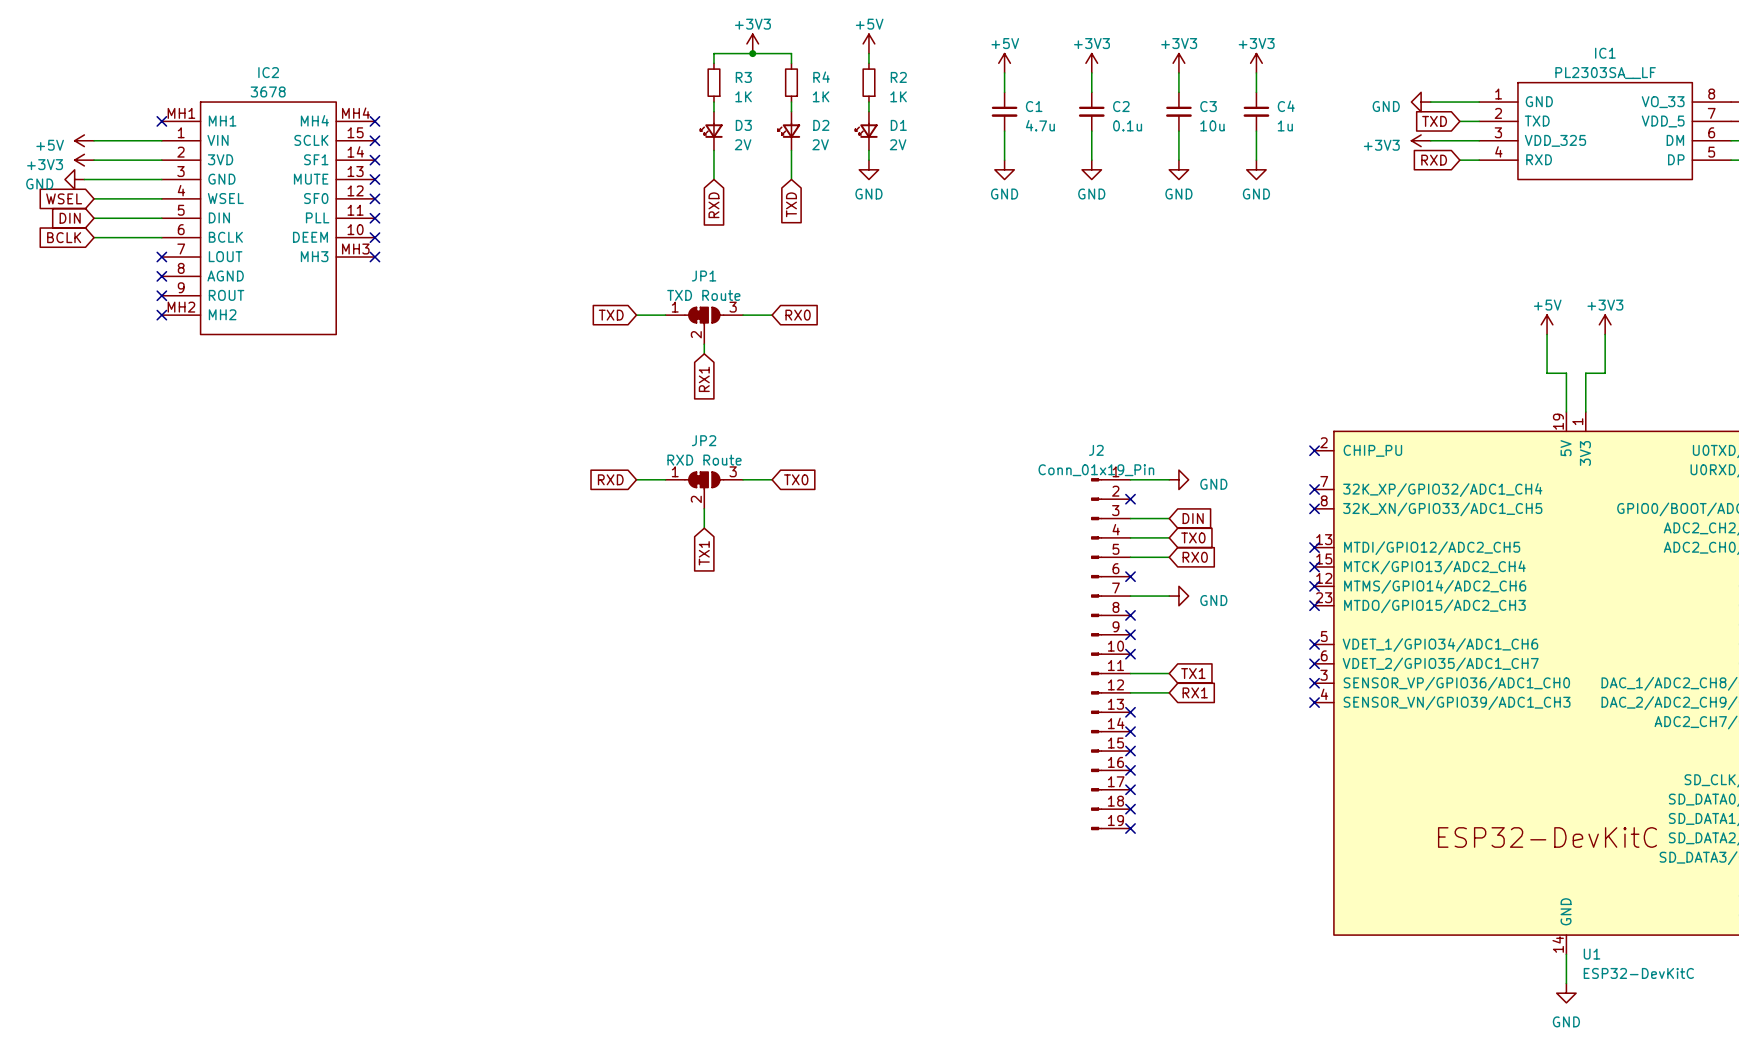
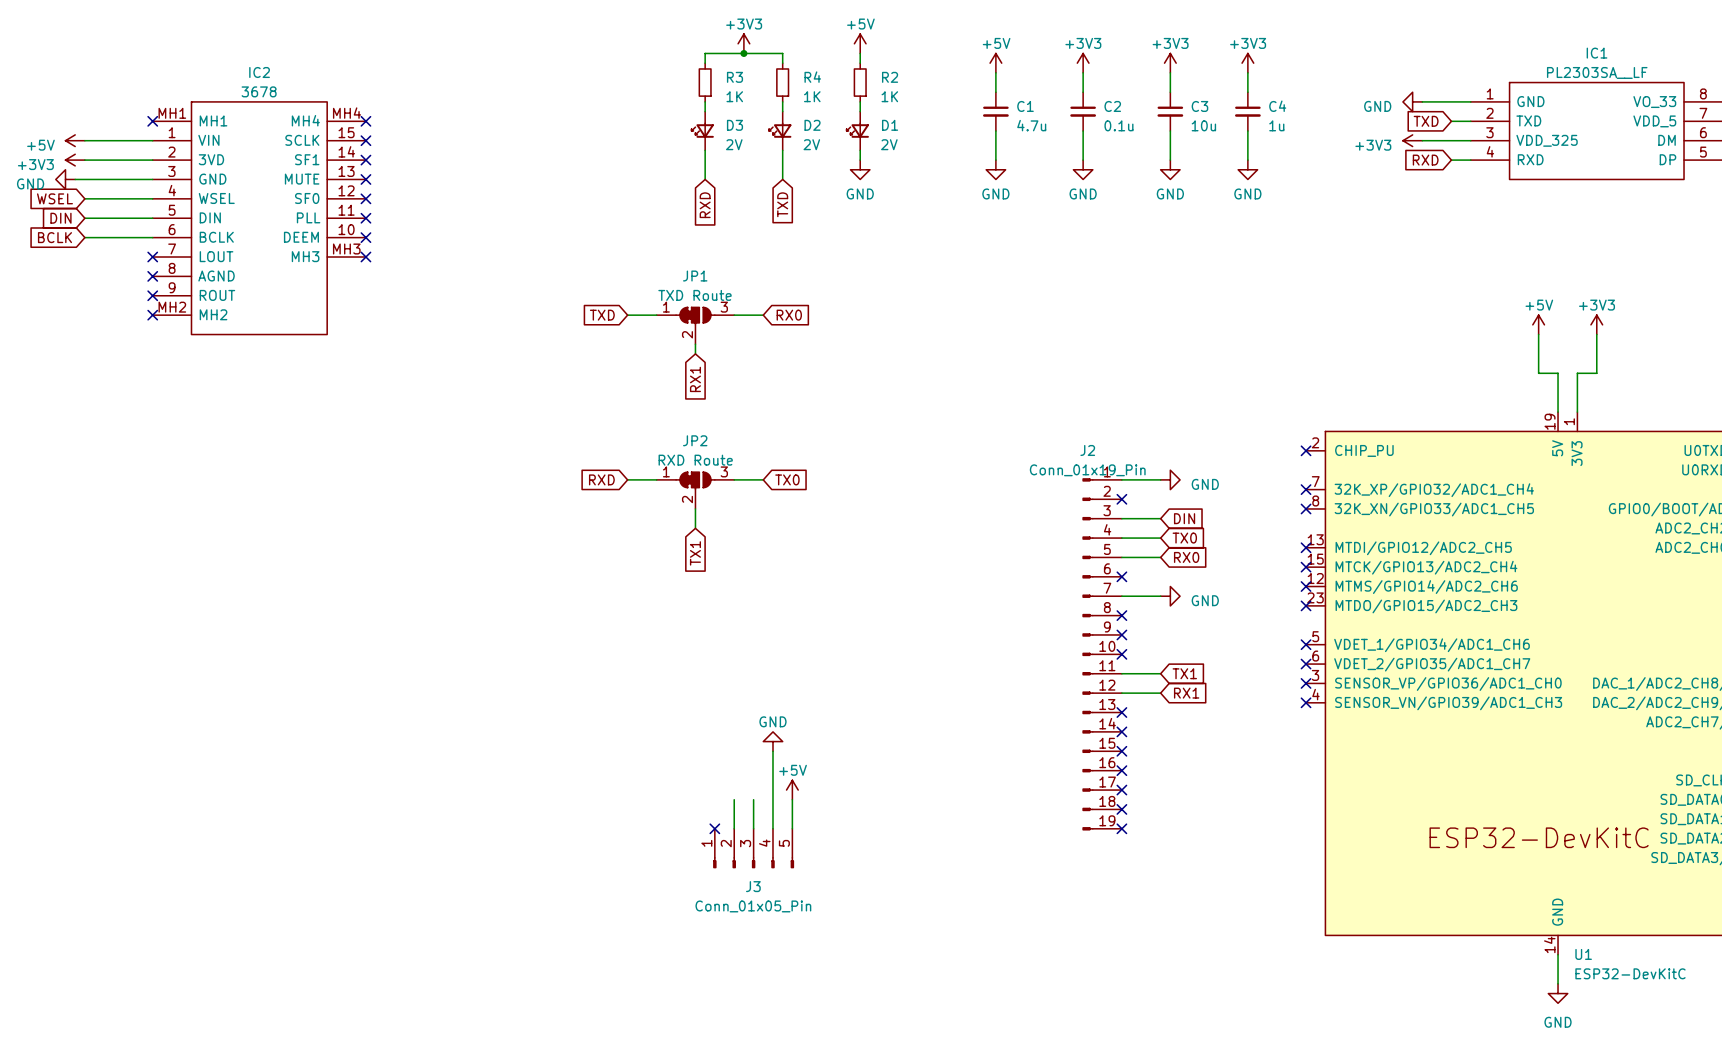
power symbol: none -> GND (772, 741)
wire: none -> (772, 751) (772, 828)
power symbol: none -> +5V (792, 790)
wire: none -> (734, 799) (734, 828)
wire: none -> (753, 799) (753, 828)
wire: none -> (792, 799) (792, 828)
no-connect mark: none -> (714, 828)
J3: none -> Conn_01x05_Pin (753, 848)

